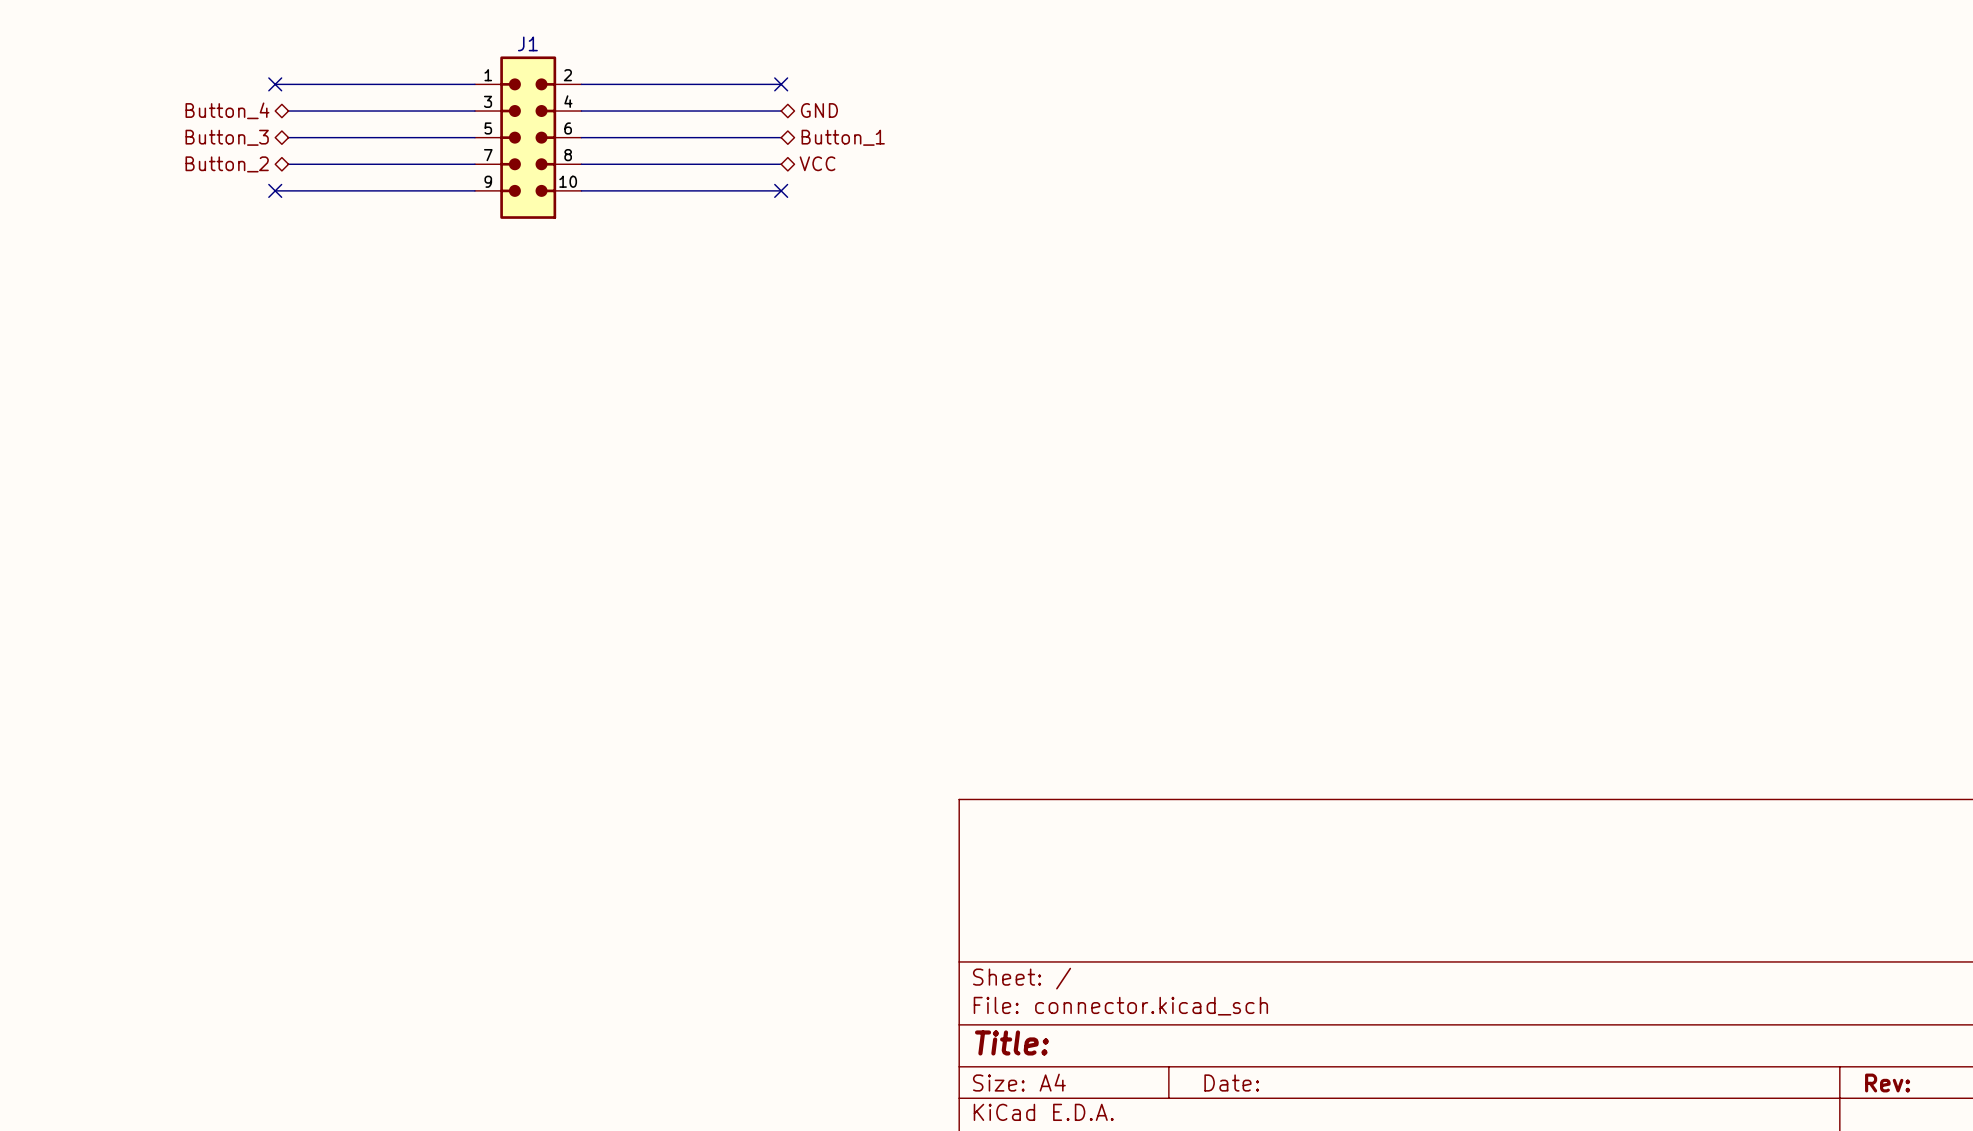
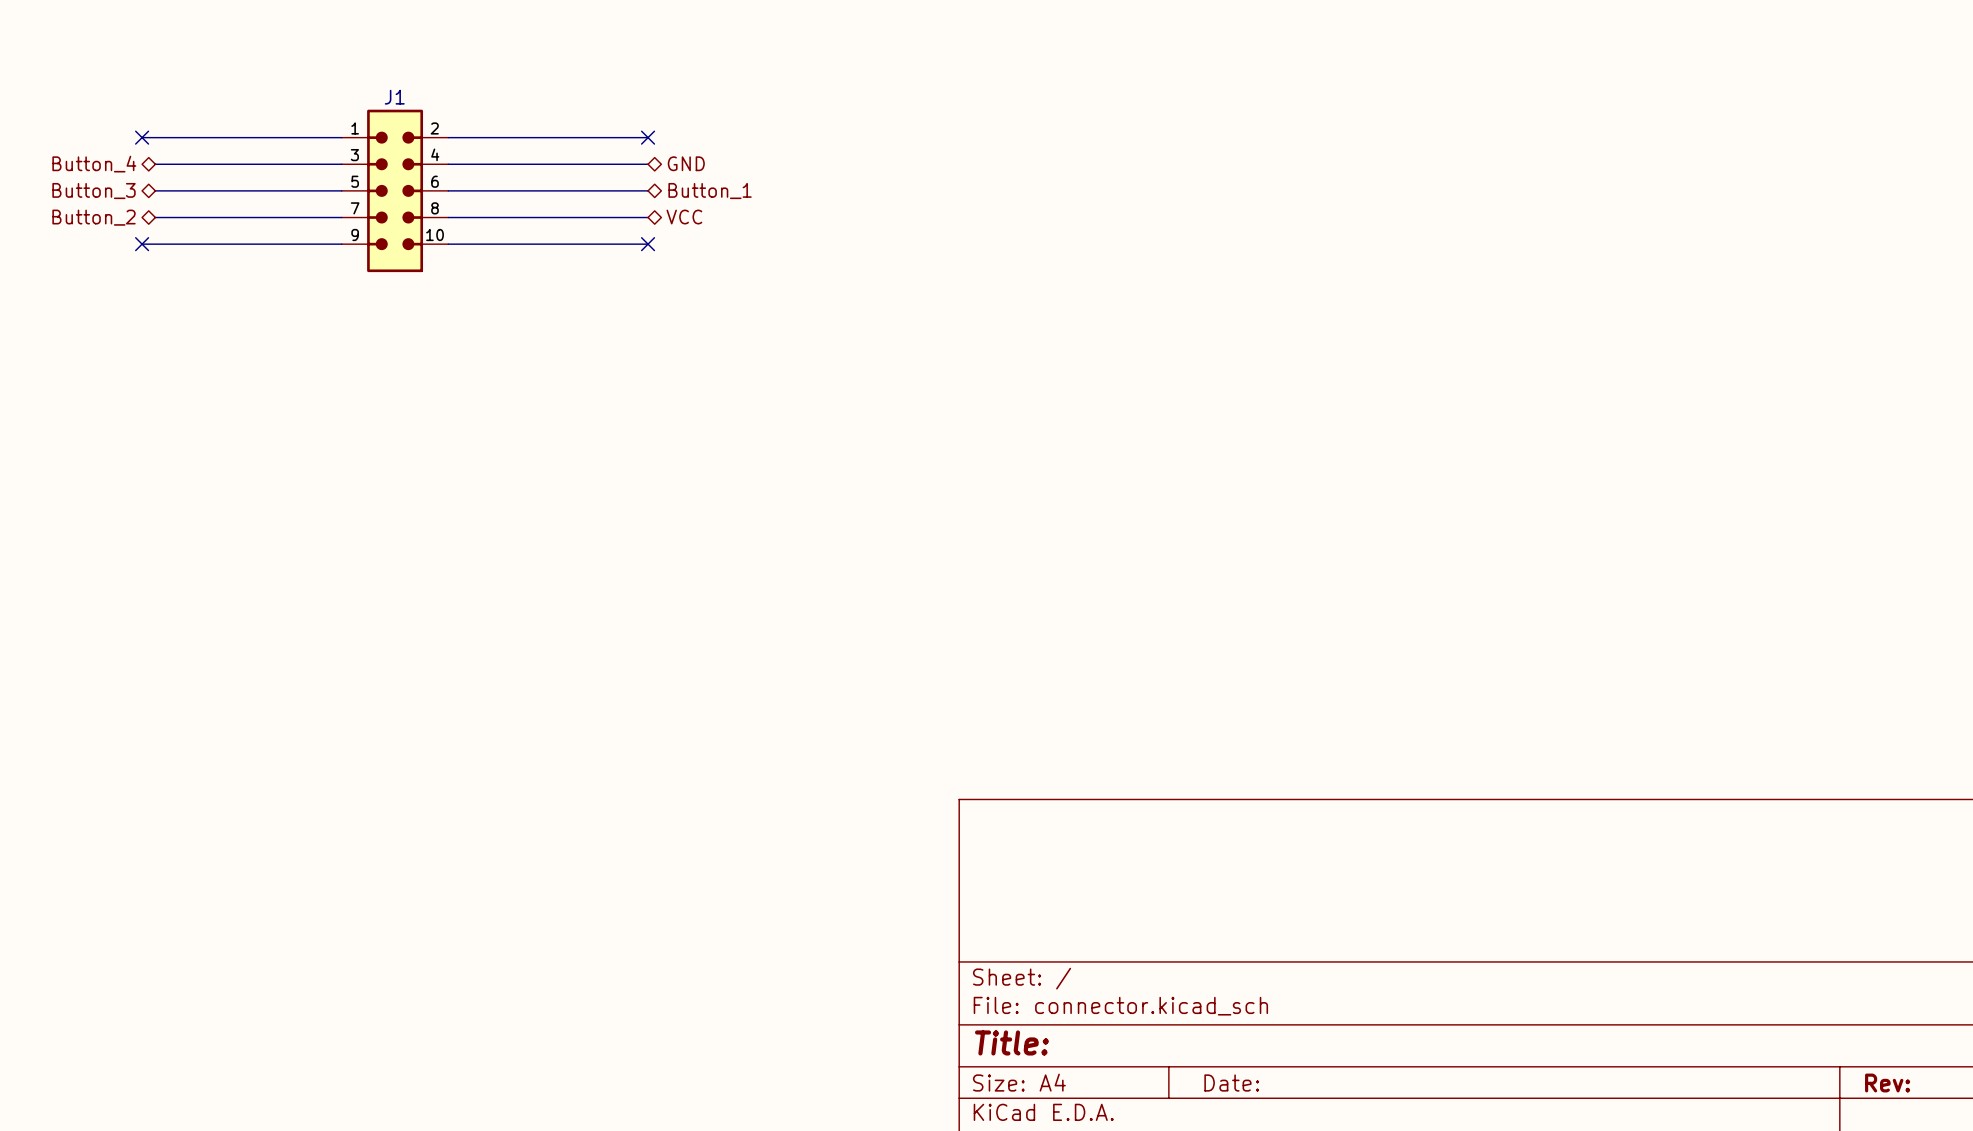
wire: (275, 84) (474, 84) -> (142, 244) (341, 244)
no-connect mark: (275, 84) -> none
wire: (581, 84) (781, 84) -> (448, 244) (648, 244)
no-connect mark: (781, 84) -> none
hierarchical label position: Button_4 (227, 110) -> Button_4 (94, 164)
hierarchical label position: GND (819, 110) -> GND (686, 163)
wire: (288, 111) (474, 111) -> (155, 217) (341, 217)
wire: (581, 111) (781, 111) -> (448, 217) (648, 217)
wire: none -> (142, 137) (288, 137)
no-connect mark: none -> (142, 137)
hierarchical label position: Button_3 (227, 137) -> Button_3 (94, 191)
J1 position: (528, 137) -> (395, 190)
wire: (648, 137) (781, 137) -> none
no-connect mark: none -> (648, 137)
hierarchical label position: Button_1 (843, 137) -> Button_1 (710, 191)
hierarchical label position: VCC (817, 163) -> VCC (684, 217)
wire: none -> (155, 164) (288, 164)
hierarchical label position: Button_2 (227, 164) -> Button_2 (94, 217)
wire: (648, 164) (781, 164) -> none
wire: none -> (155, 190) (275, 190)
no-connect mark: (275, 190) -> none
wire: (648, 190) (781, 190) -> none
no-connect mark: (781, 190) -> none
no-connect mark: none -> (142, 244)
no-connect mark: none -> (648, 244)

